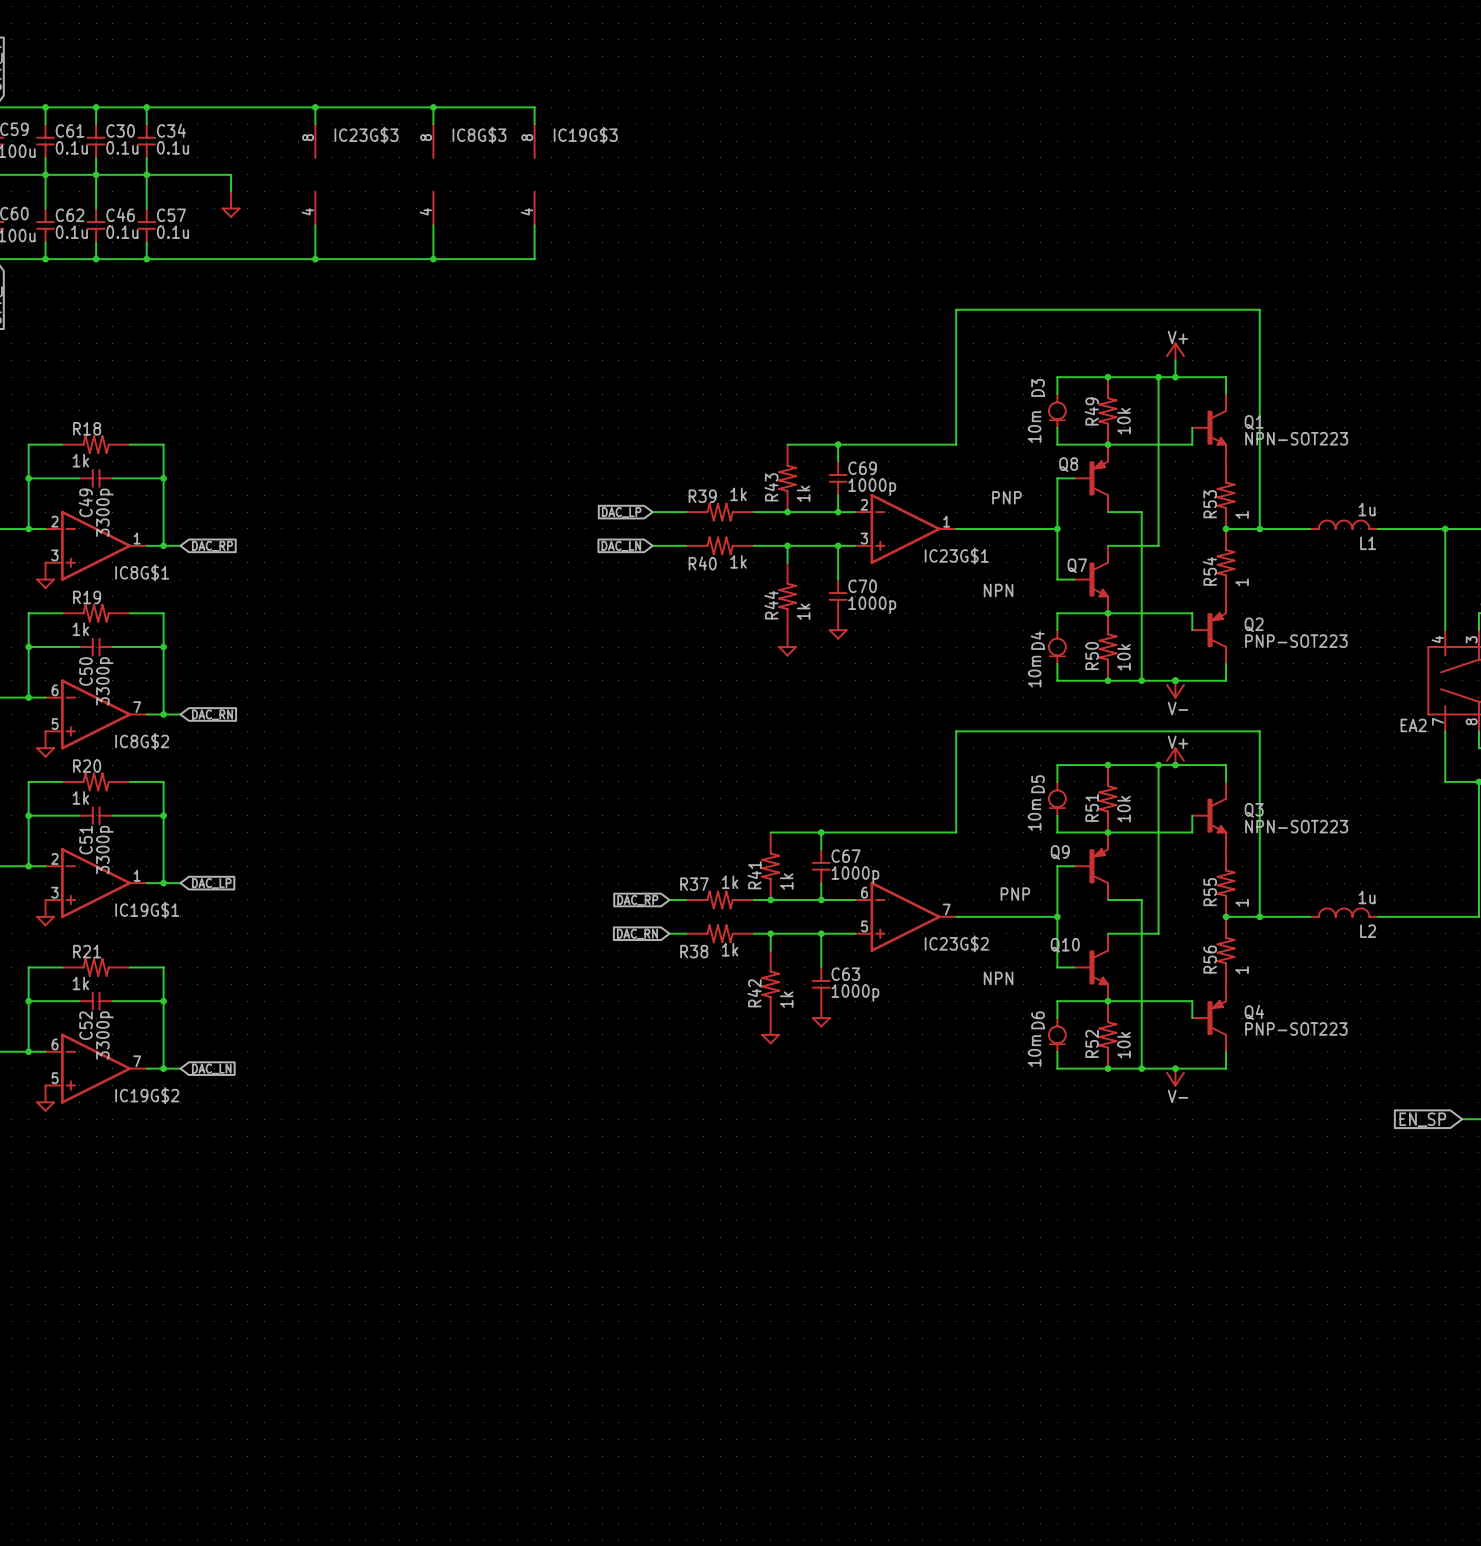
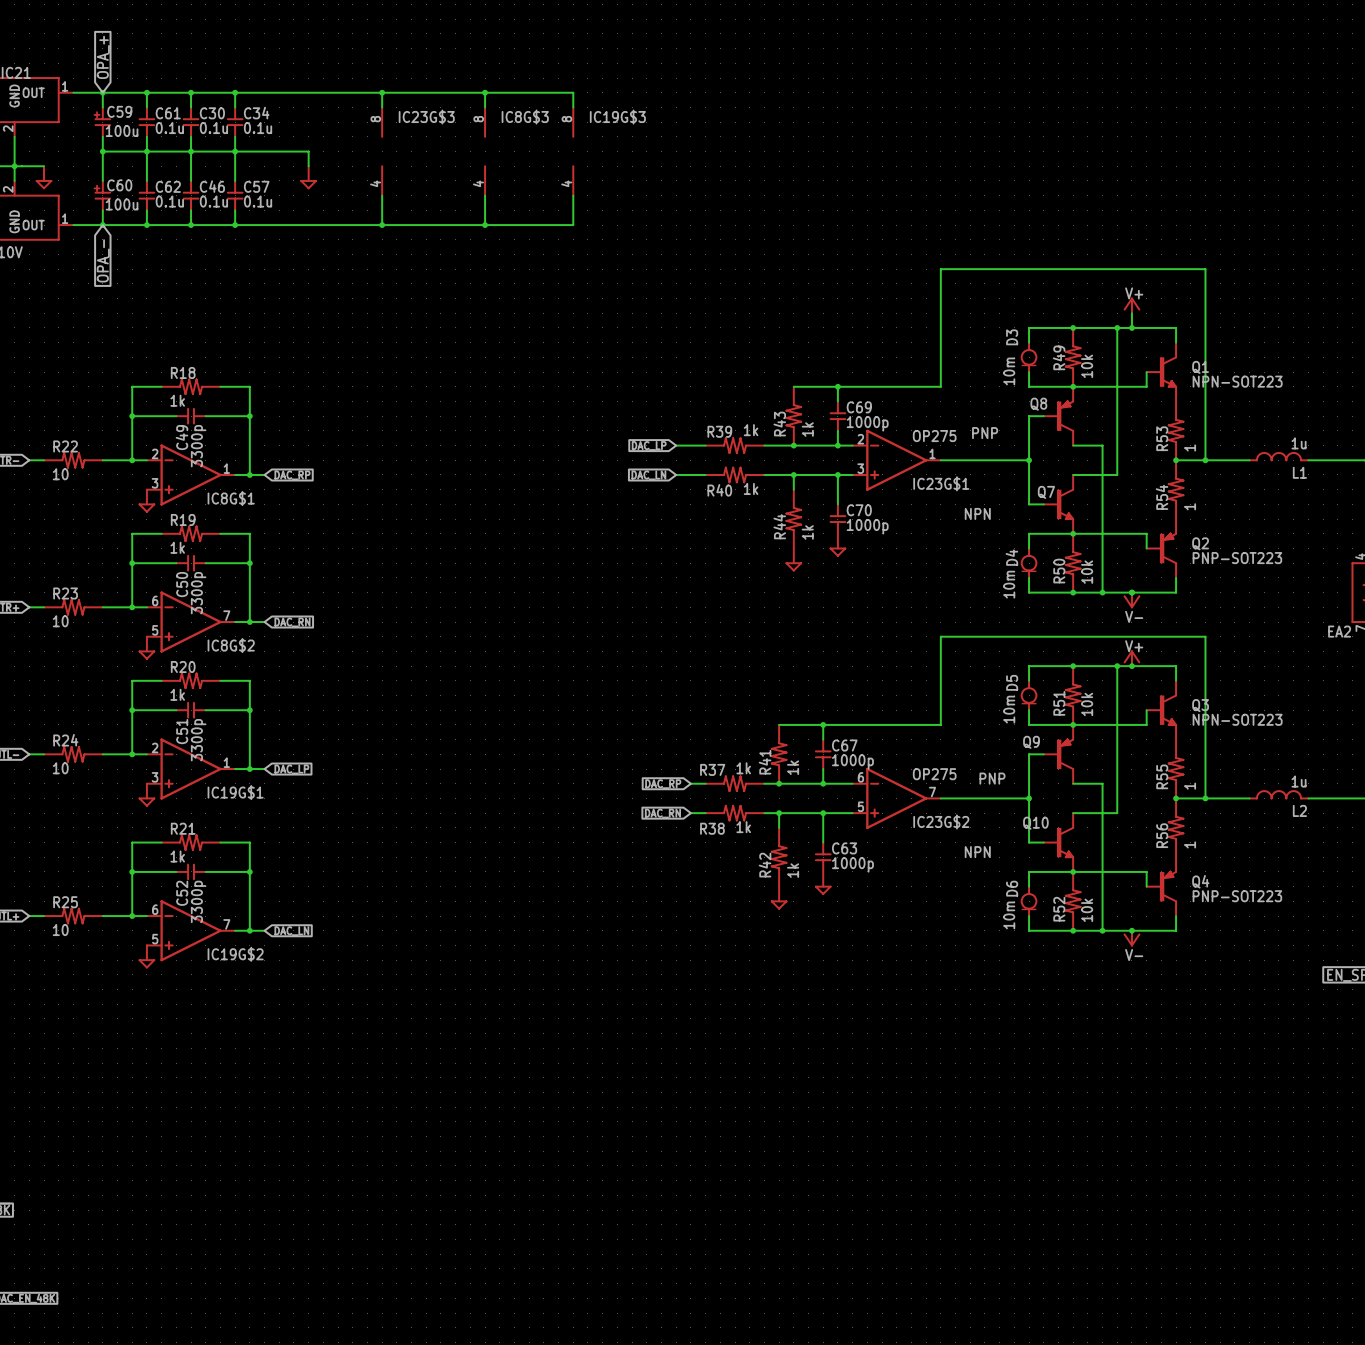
IC23G$1 value: none -> OP275 (934, 436)
IC23G$2 value: none -> OP275 (934, 774)

